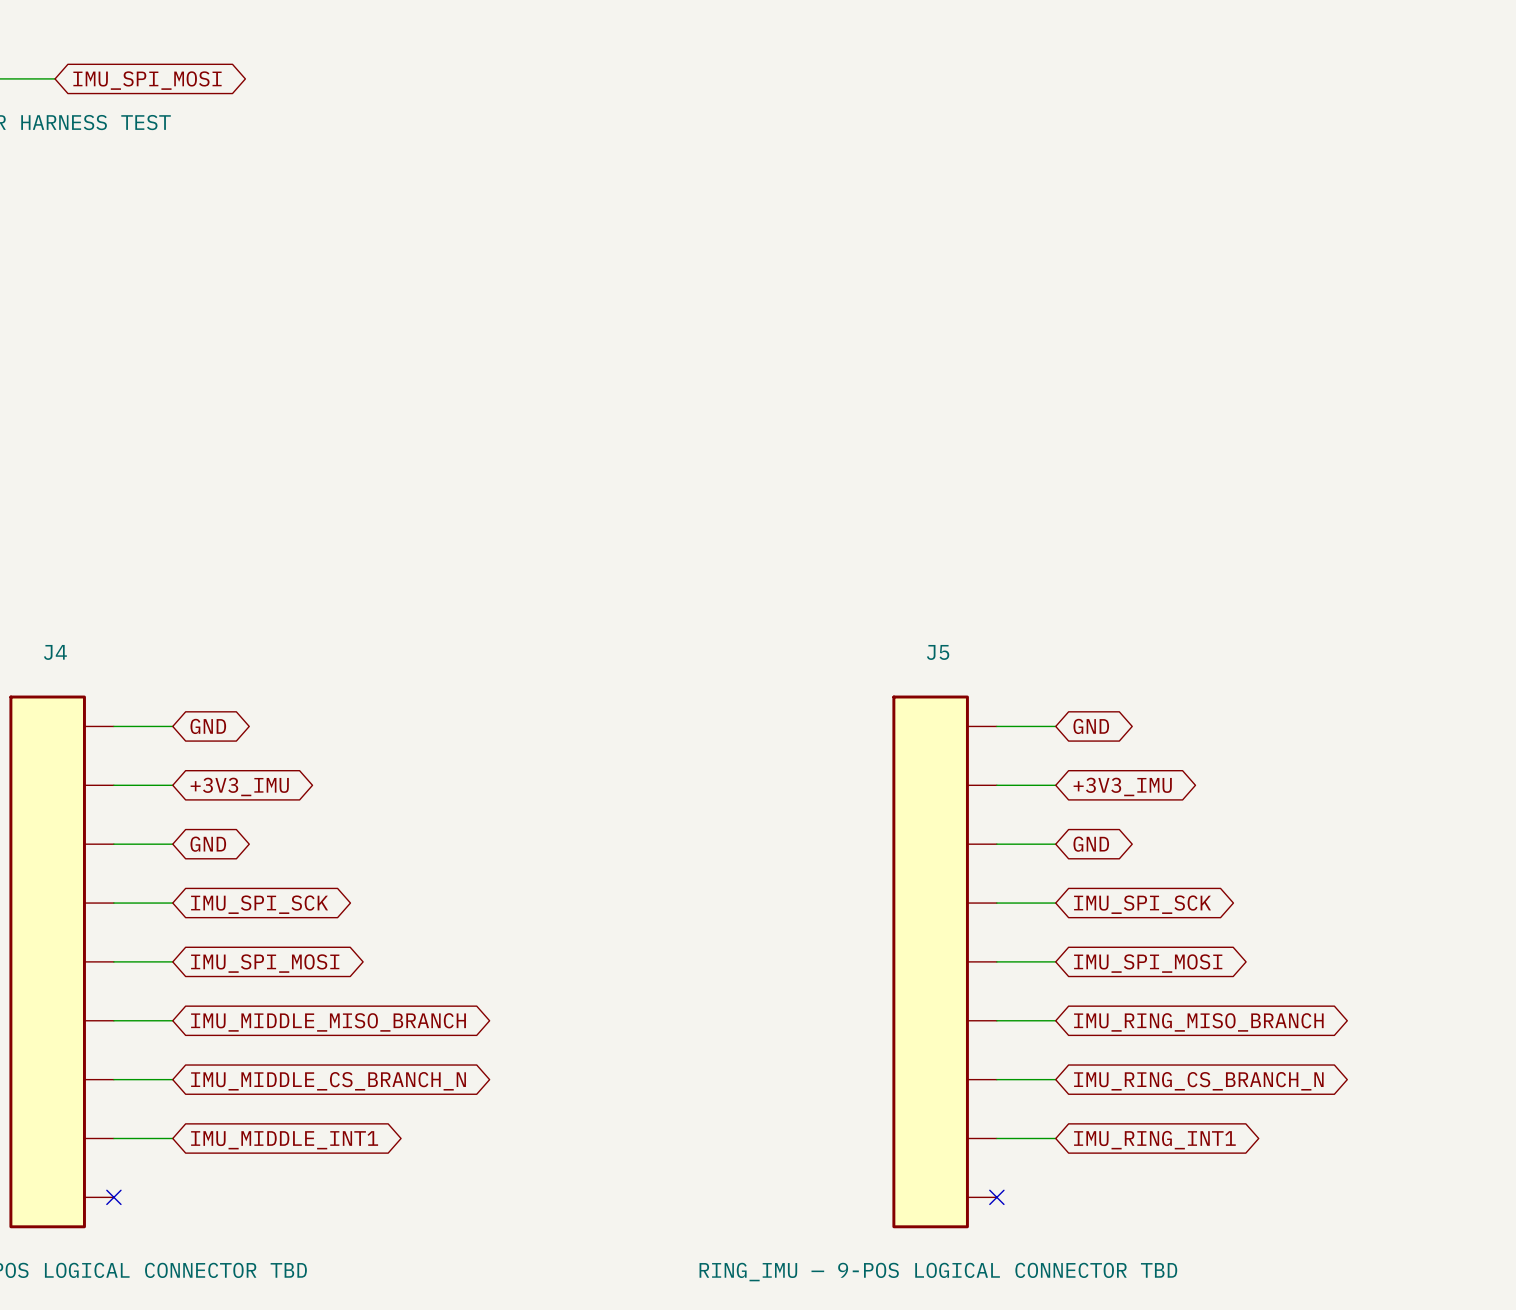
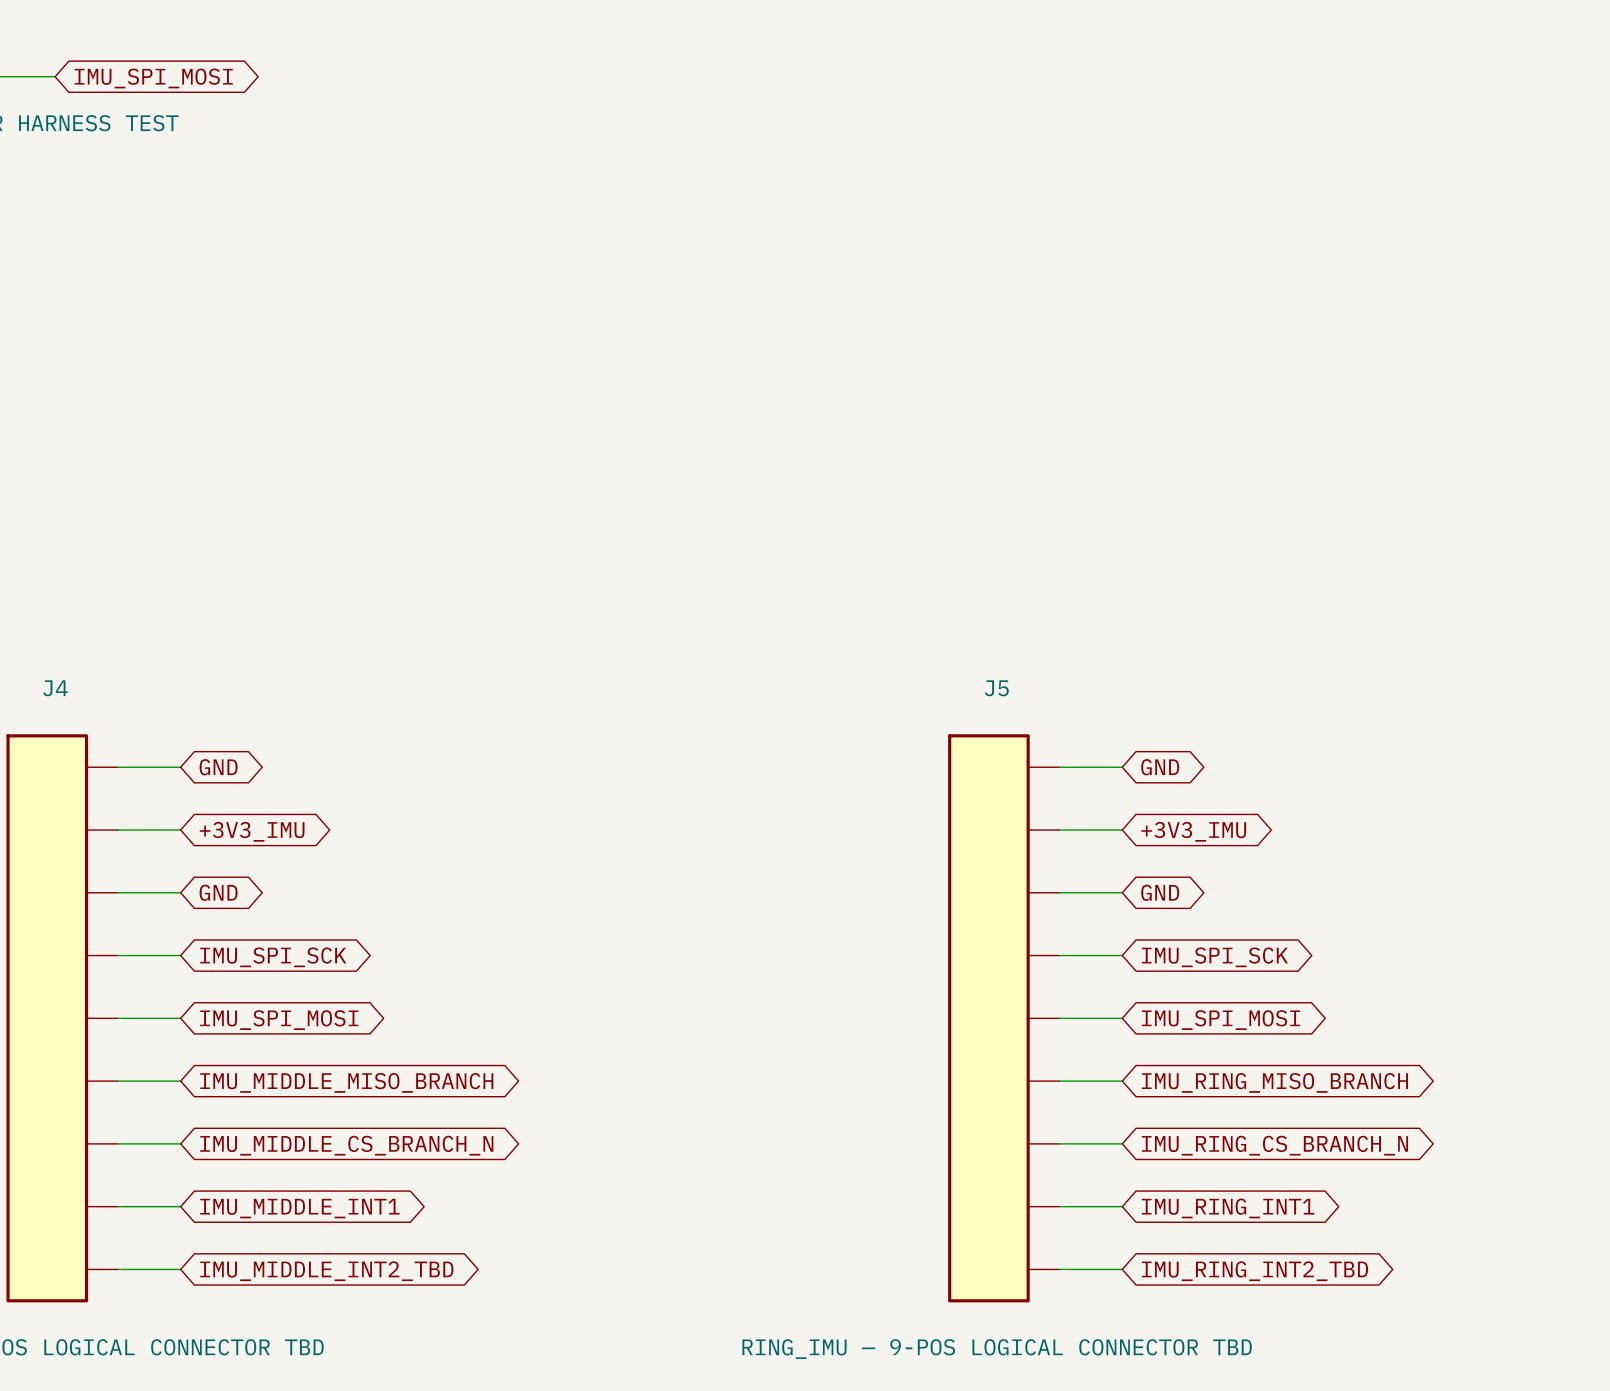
wire: none -> (117, 1269) (180, 1269)
no-connect mark: (113, 1197) -> none
wire: none -> (1059, 1269) (1122, 1269)
no-connect mark: (996, 1197) -> none
global label: none -> IMU_MIDDLE_INT2_TBD (326, 1271)
global label: none -> IMU_RING_INT2_TBD (1254, 1271)

